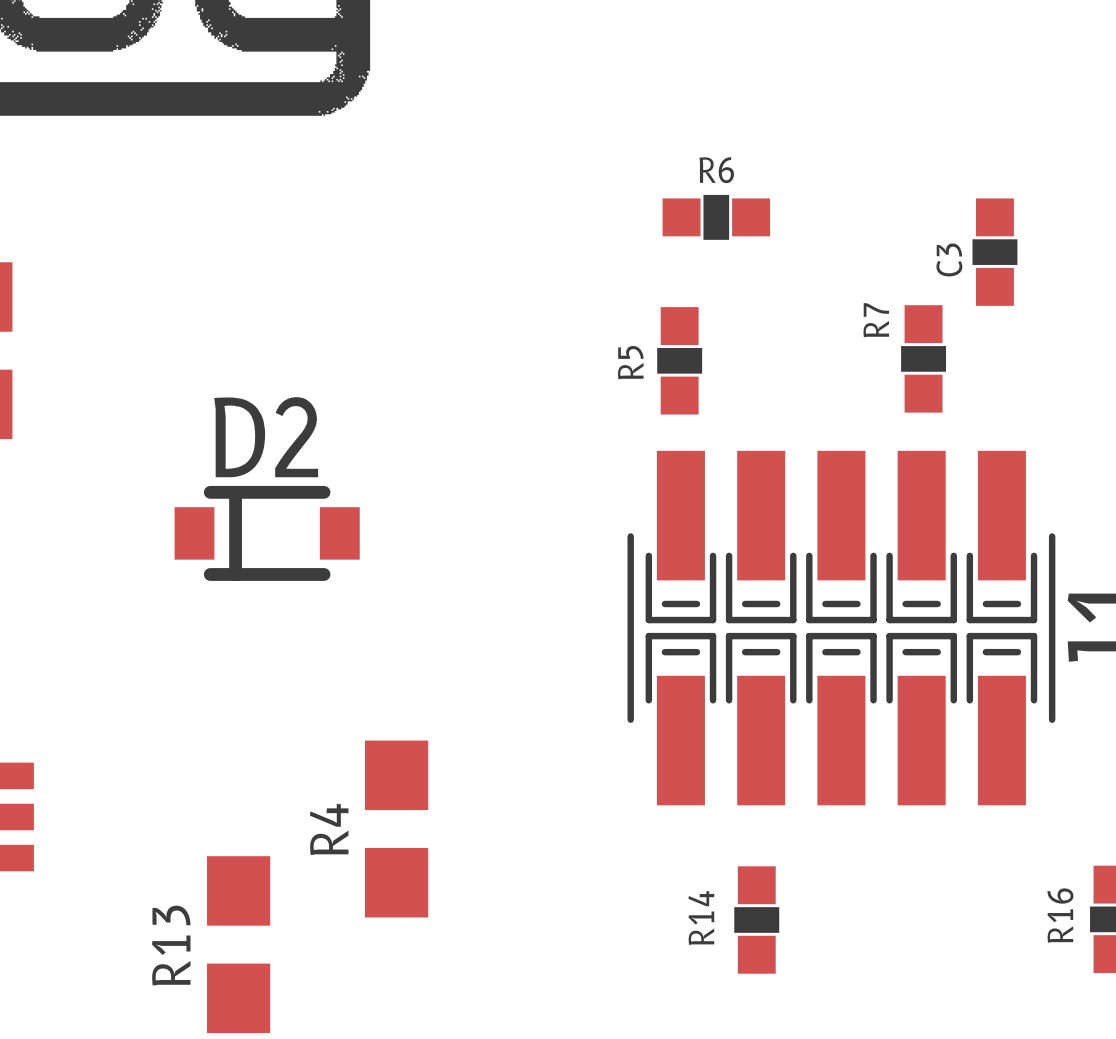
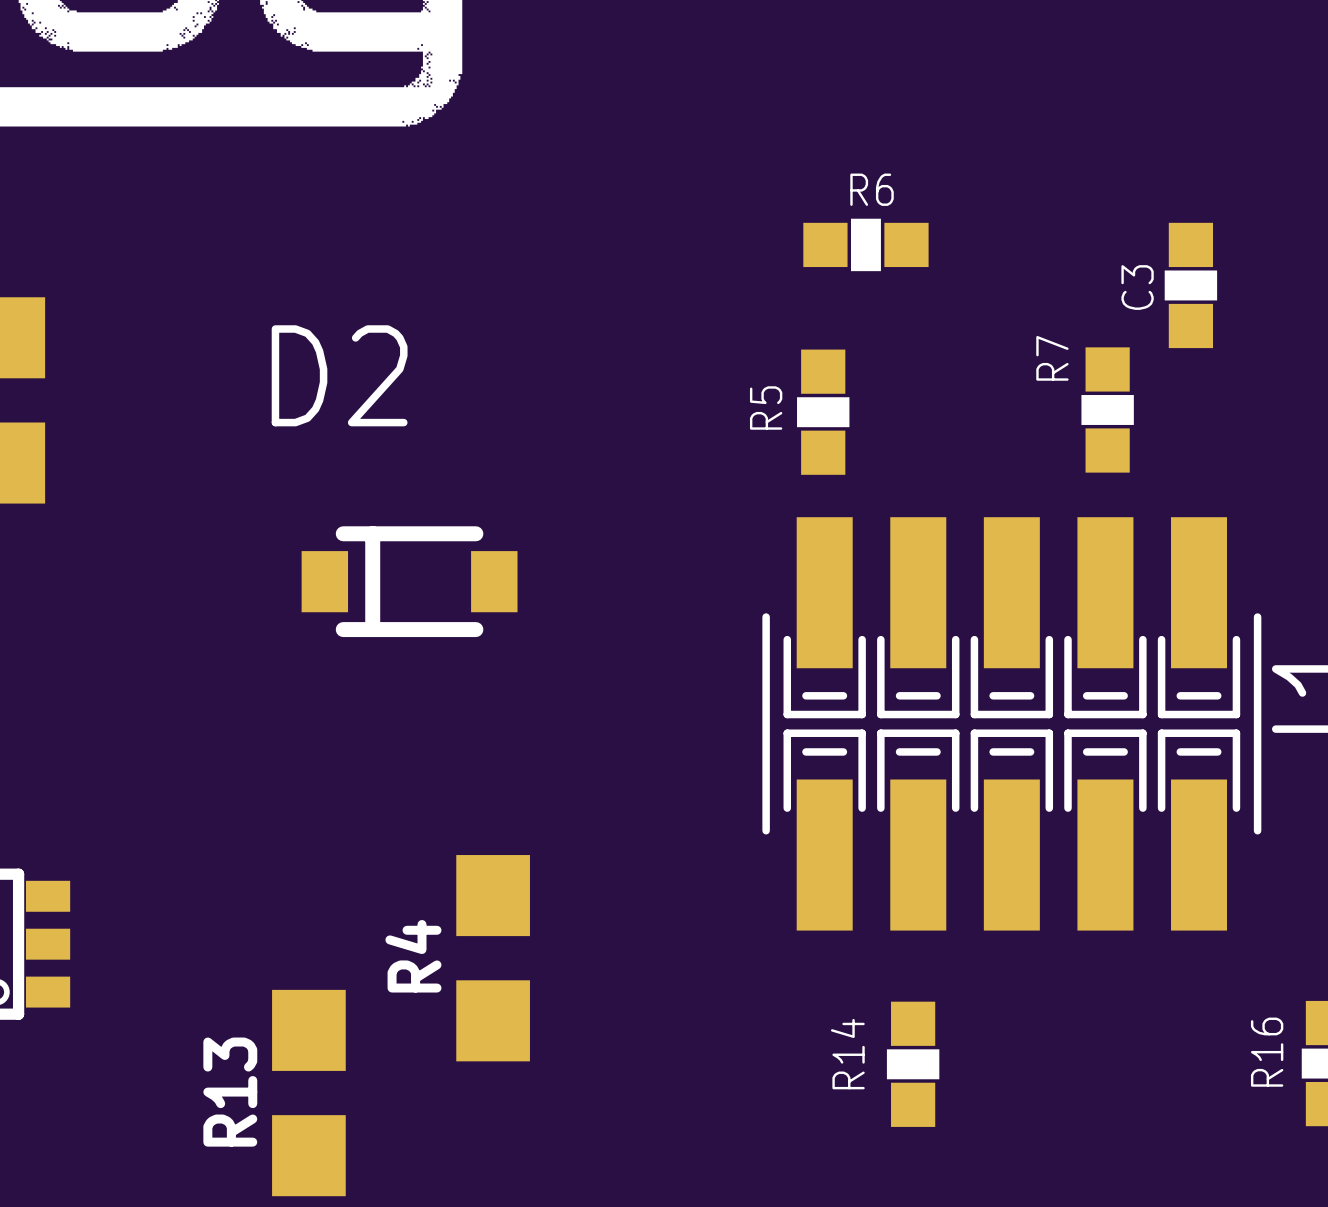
D2 name position: D2 (266, 437) -> D2 (339, 375)
D2 position: (267, 533) -> (409, 581)

